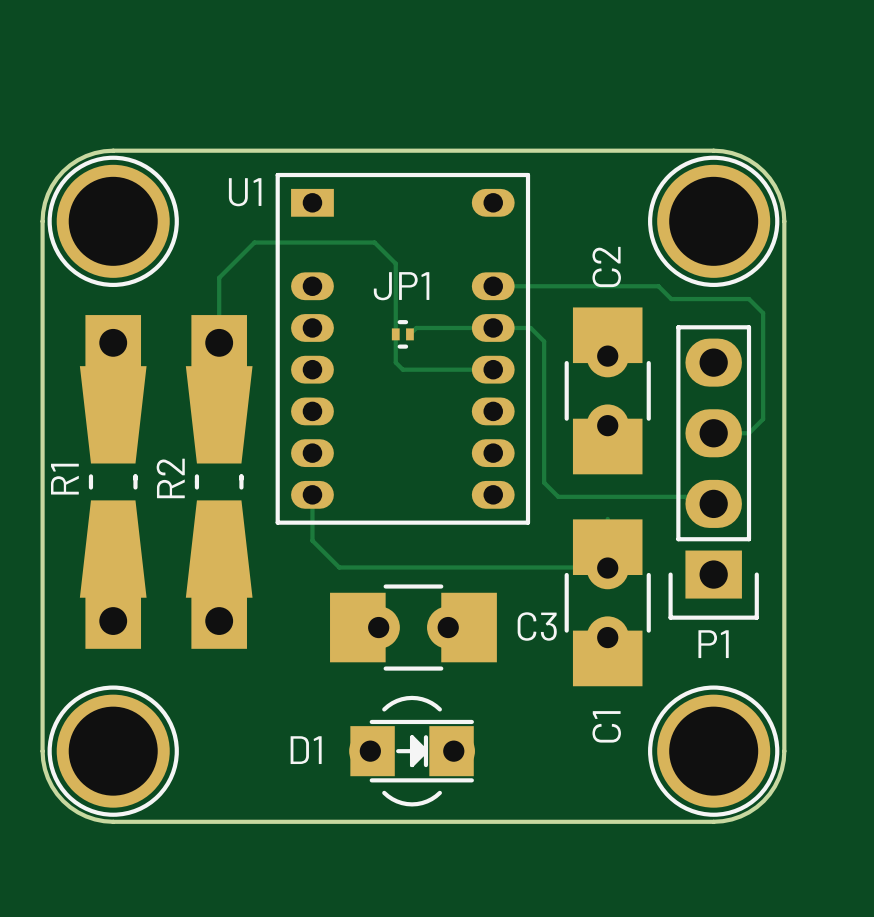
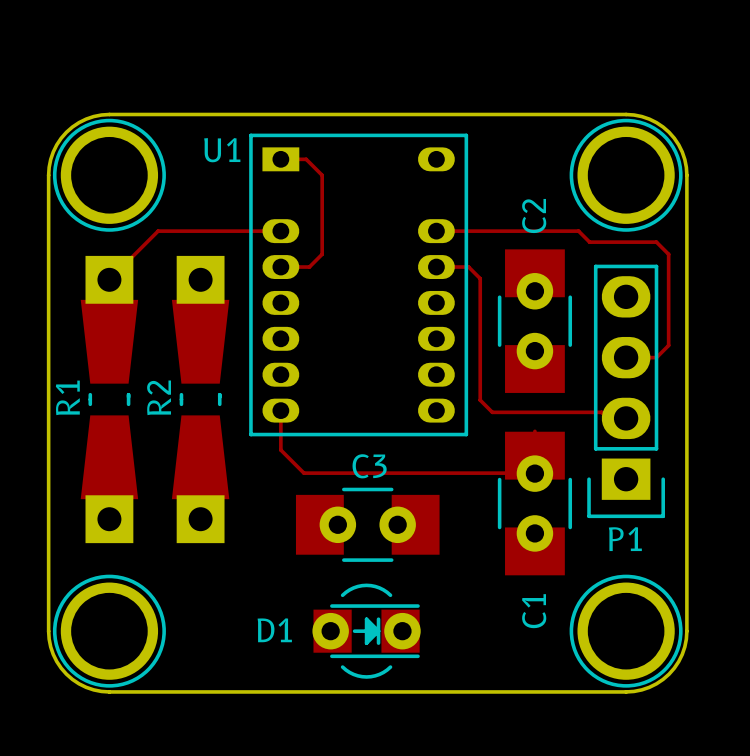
track: none -> (280, 159) (306, 159) (322, 175) (322, 254) (309, 267) (297, 267)
track: none -> (280, 231) (158, 231) (109, 279)
track: (493, 327) (416, 327) (409, 334) -> none
JP1: (402, 334) -> none
track: (219, 342) (219, 277) (254, 242) (374, 242) (395, 263) (395, 362) (402, 369) (493, 369) -> none
C3 name position: C3 (537, 626) -> C3 (369, 466)

